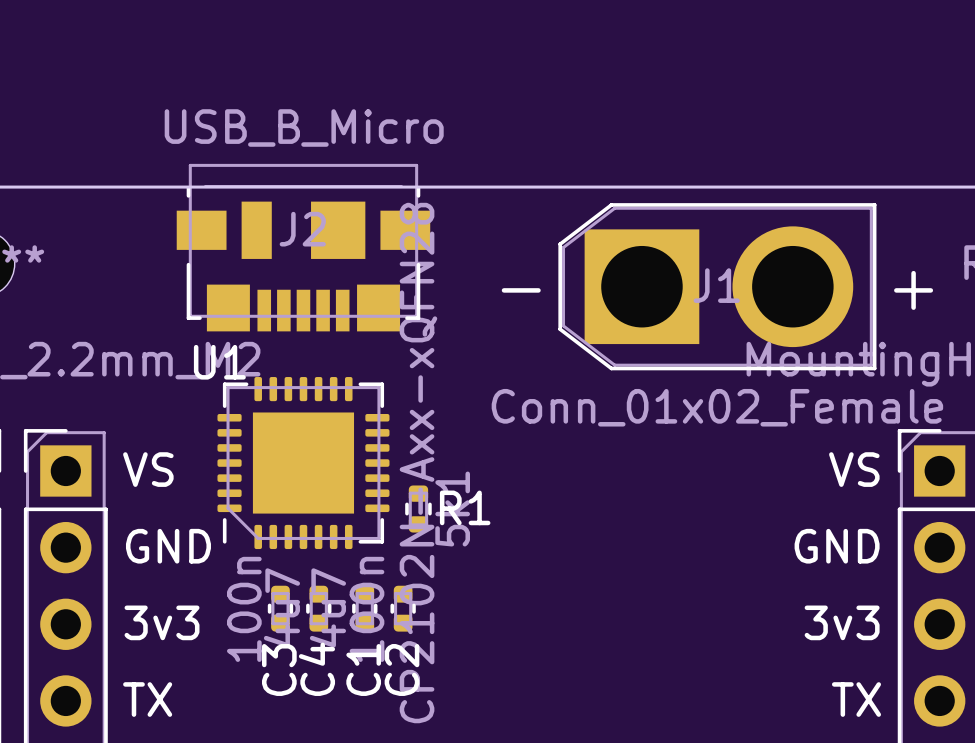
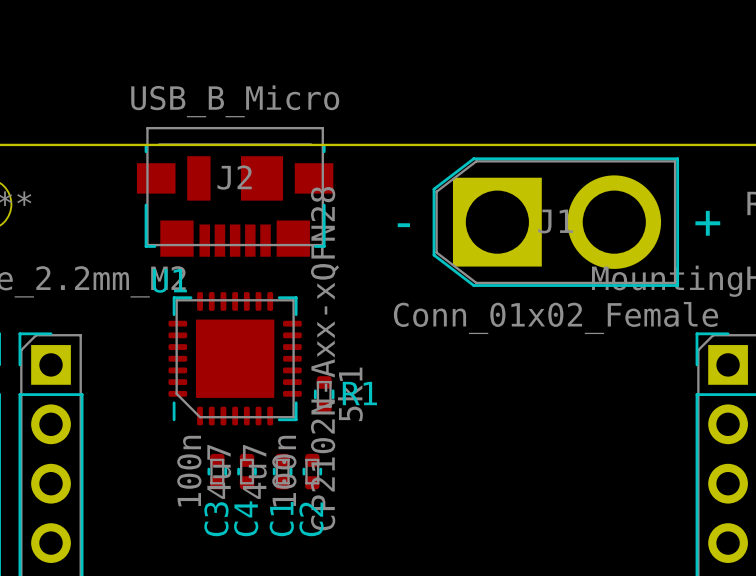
text: VS (148, 469) -> none
text: VS (854, 469) -> none
text: GND (168, 546) -> none
text: GND (837, 546) -> none
text: 3v3 (162, 622) -> none
text: 3v3 (842, 622) -> none
text: TX (147, 699) -> none
text: TX (856, 699) -> none

